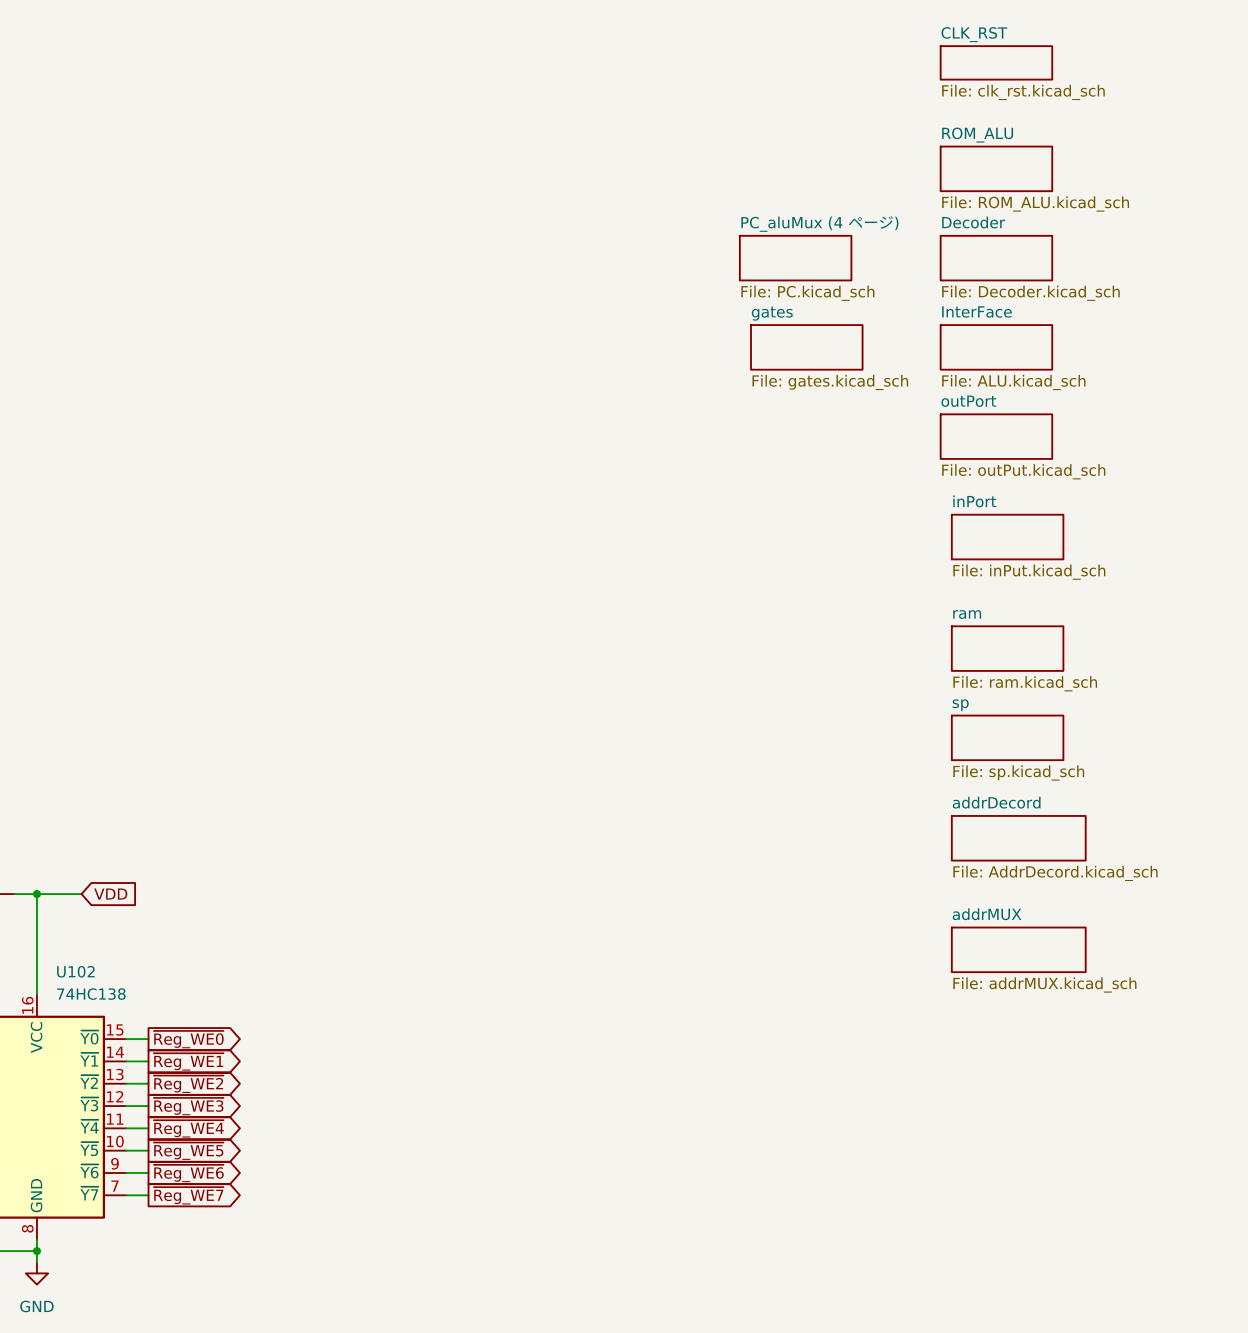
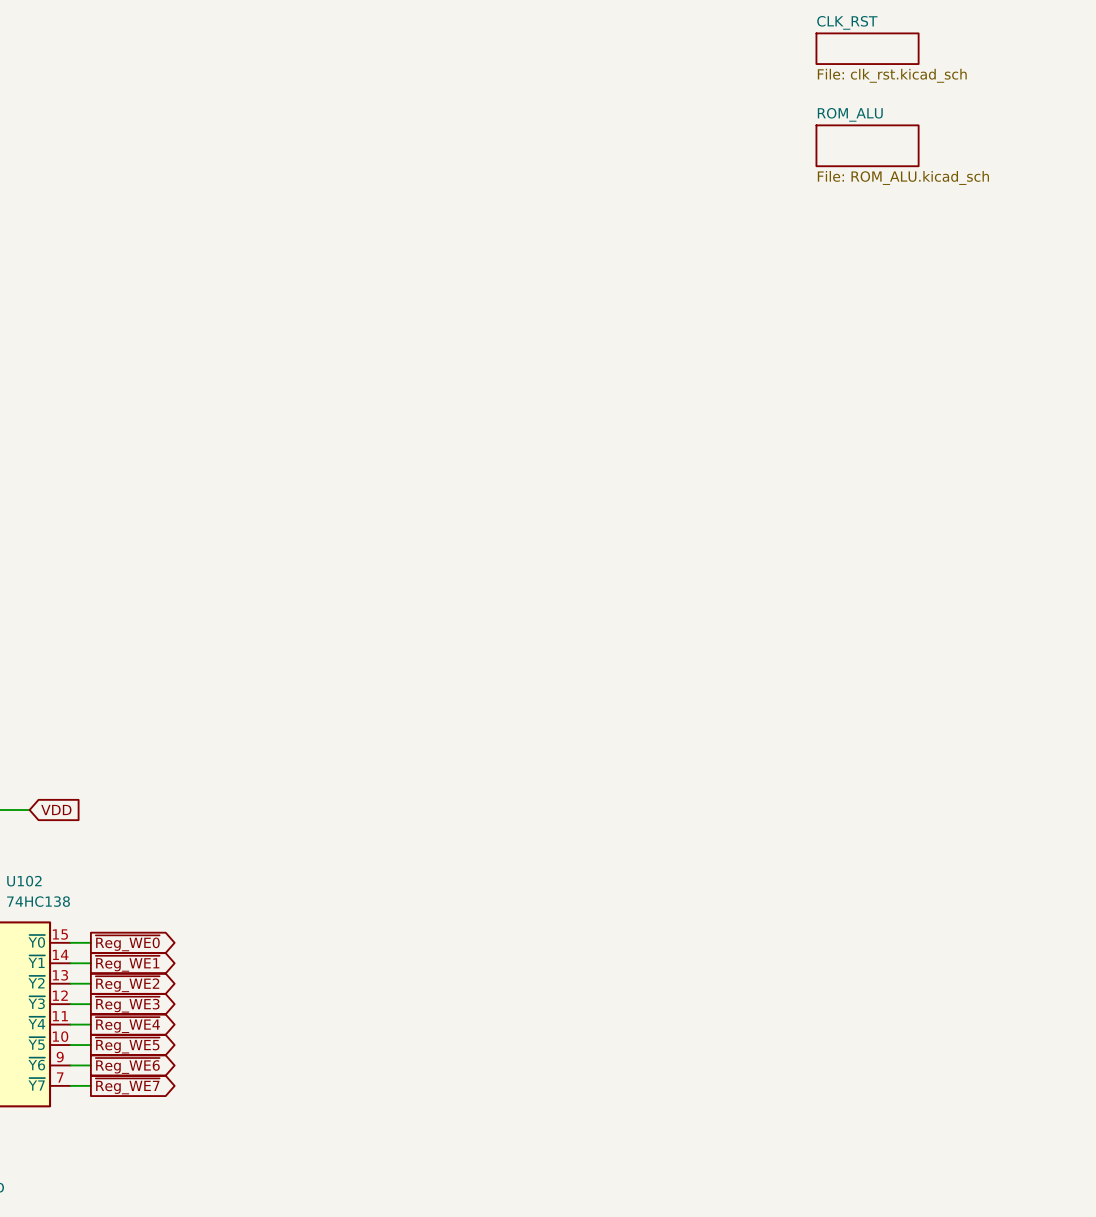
sheet PC_aluMux (4 ページ): File: PC.kicad_sch (795, 258) -> none
sheet Decoder: File: Decoder.kicad_sch (996, 258) -> none
sheet gates: File: gates.kicad_sch (806, 347) -> none
sheet InterFace: File: ALU.kicad_sch (996, 347) -> none
sheet outPort: File: outPut.kicad_sch (996, 436) -> none
sheet inPort: File: inPut.kicad_sch (1007, 537) -> none
sheet ram: File: ram.kicad_sch (1007, 648) -> none
sheet sp: File: sp.kicad_sch (1007, 737) -> none
sheet addrDecord: File: AddrDecord.kicad_sch (1018, 838) -> none
sheet addrMUX: File: addrMUX.kicad_sch (1018, 949) -> none

